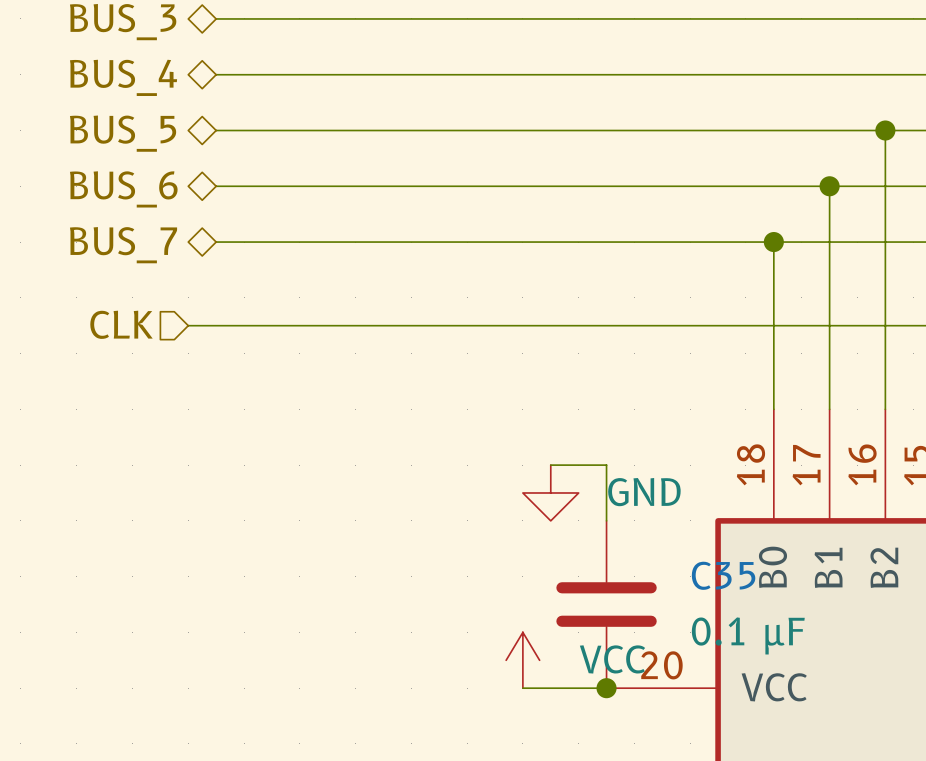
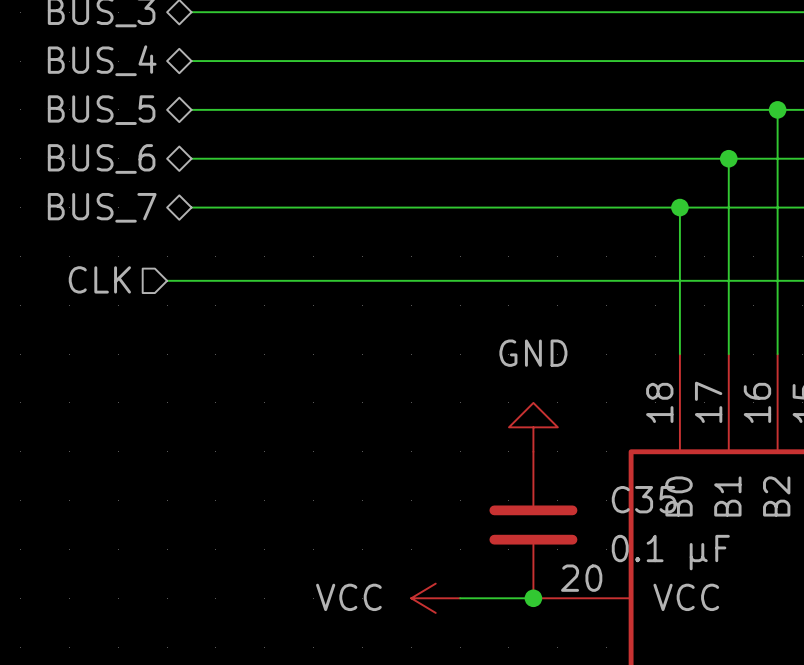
wire: (550, 465) (606, 465) (606, 520) -> none
power symbol rotation: 0° (550, 492) -> 180° (533, 427)
power symbol position: GND (550, 492) -> GND (533, 427)
power symbol text position: GND (644, 492) -> GND (533, 353)
power symbol text position: VCC (612, 659) -> VCC (348, 597)
power symbol rotation: 0° (522, 660) -> 90° counterclockwise (435, 598)
power symbol position: VCC (522, 660) -> VCC (435, 598)

